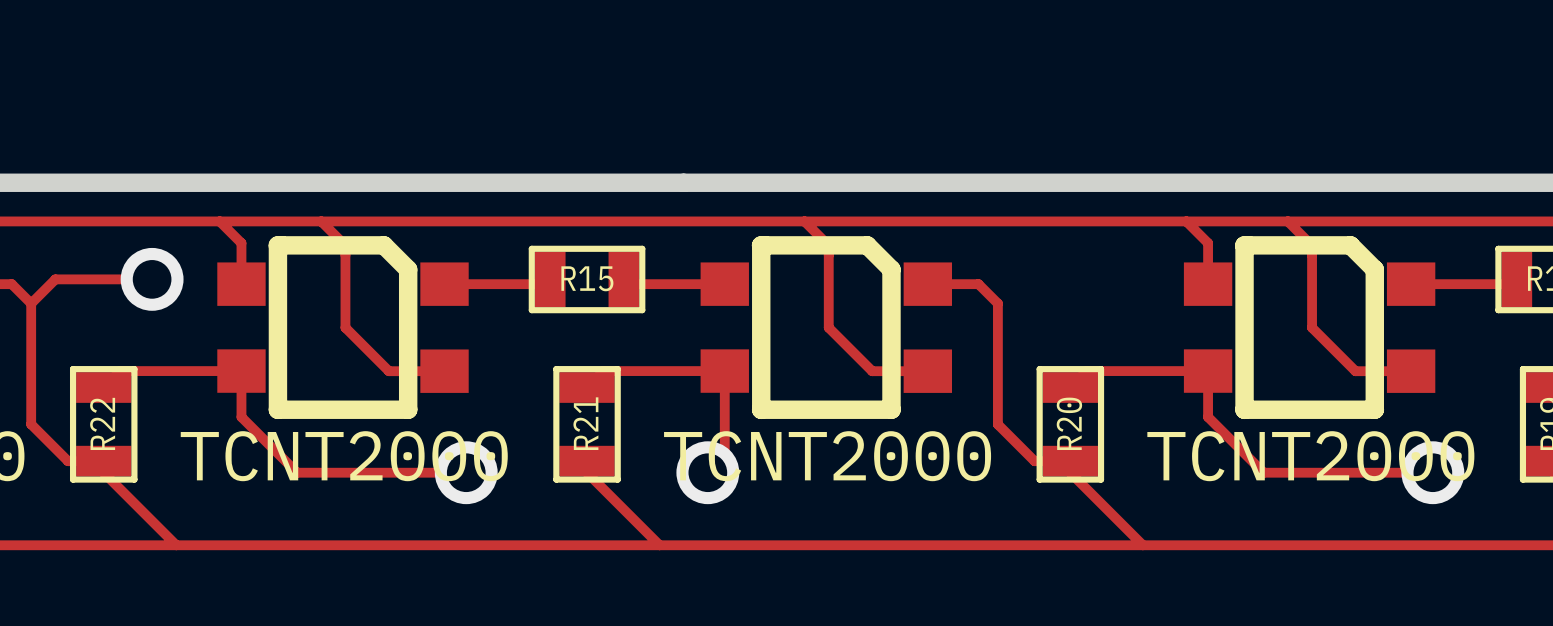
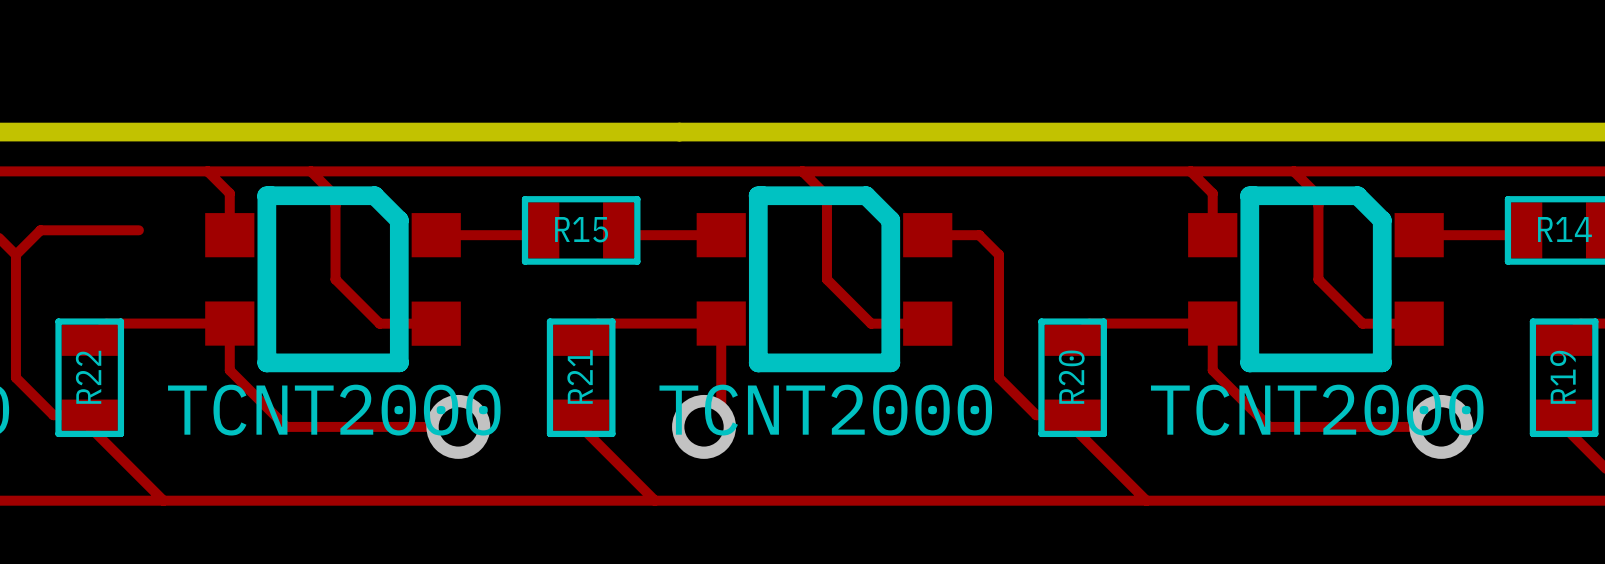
via: (152, 279) -> none

